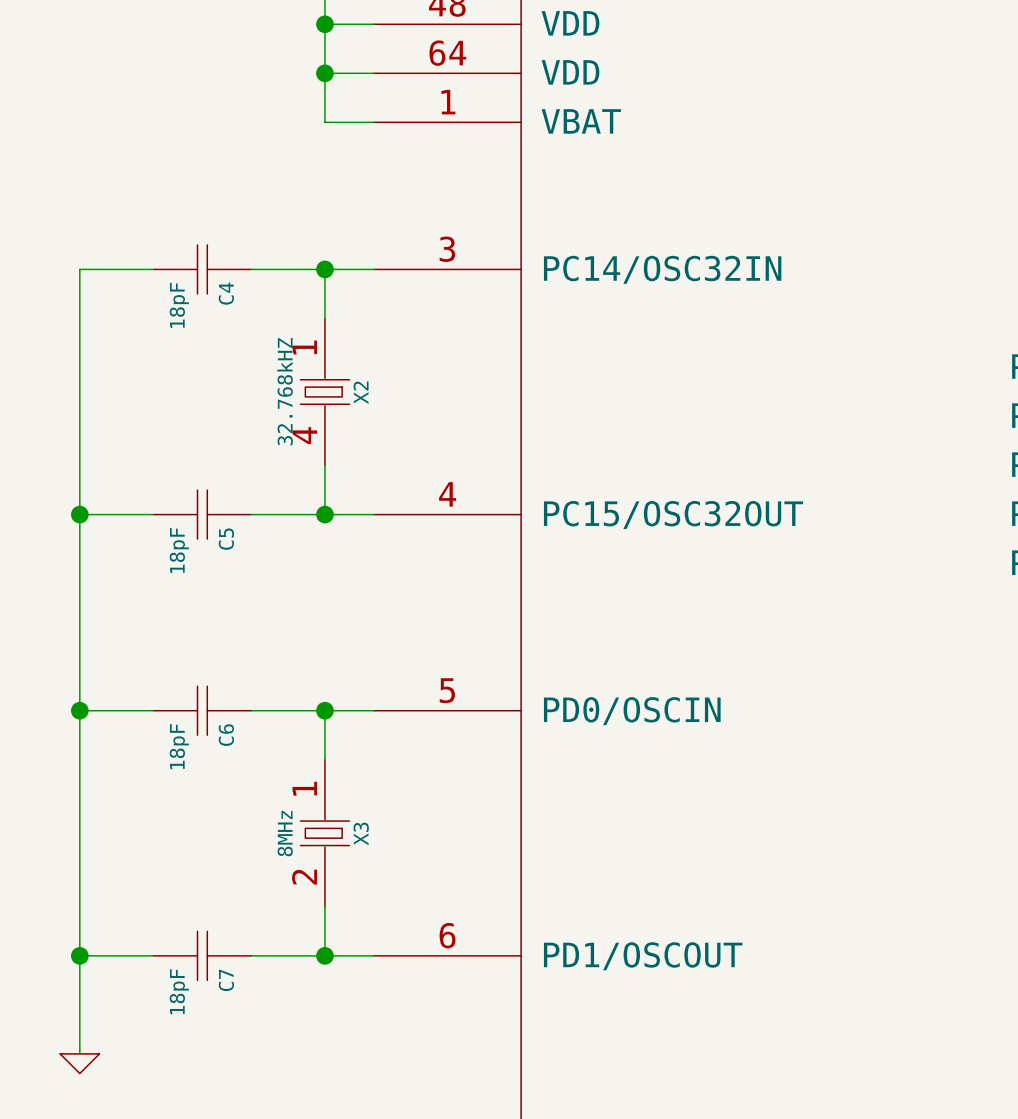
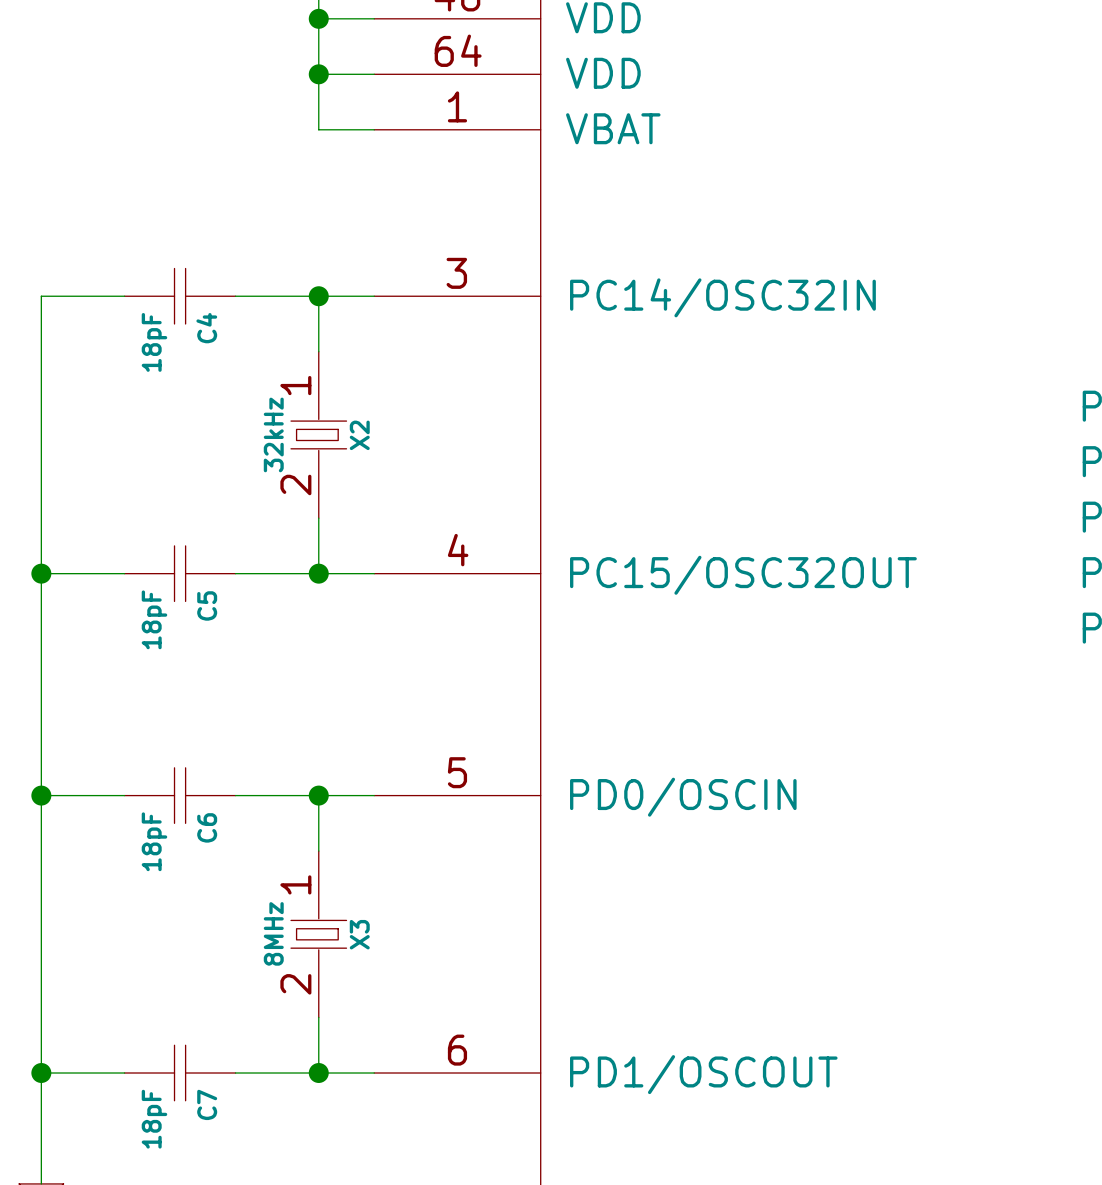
X2 value: 32.768kHZ (285, 391) -> 32kHz (273, 434)
X2 pin number: 4 (304, 435) -> 2 (295, 484)

